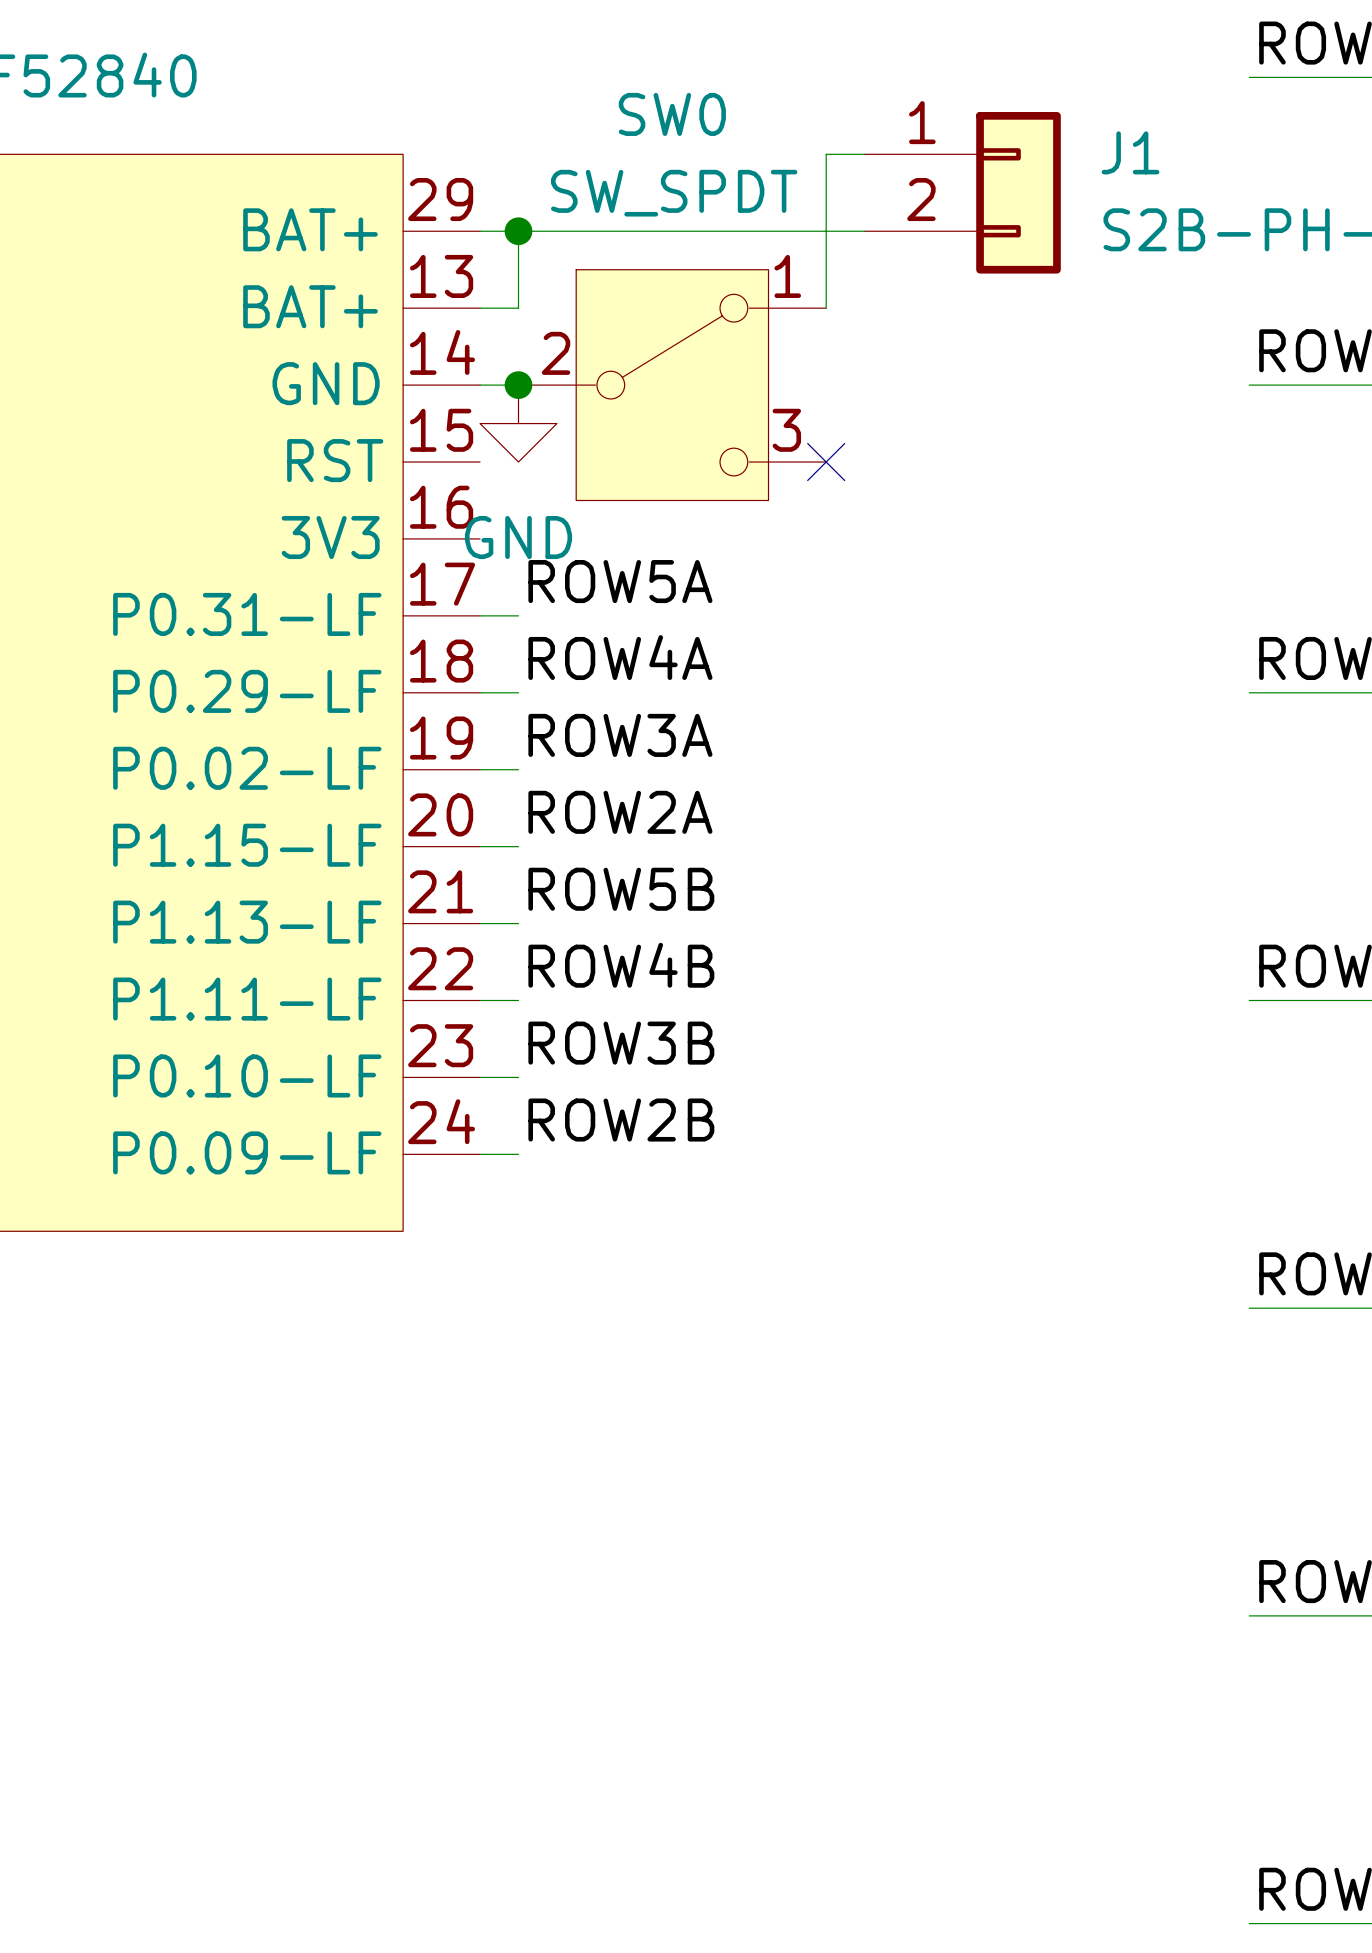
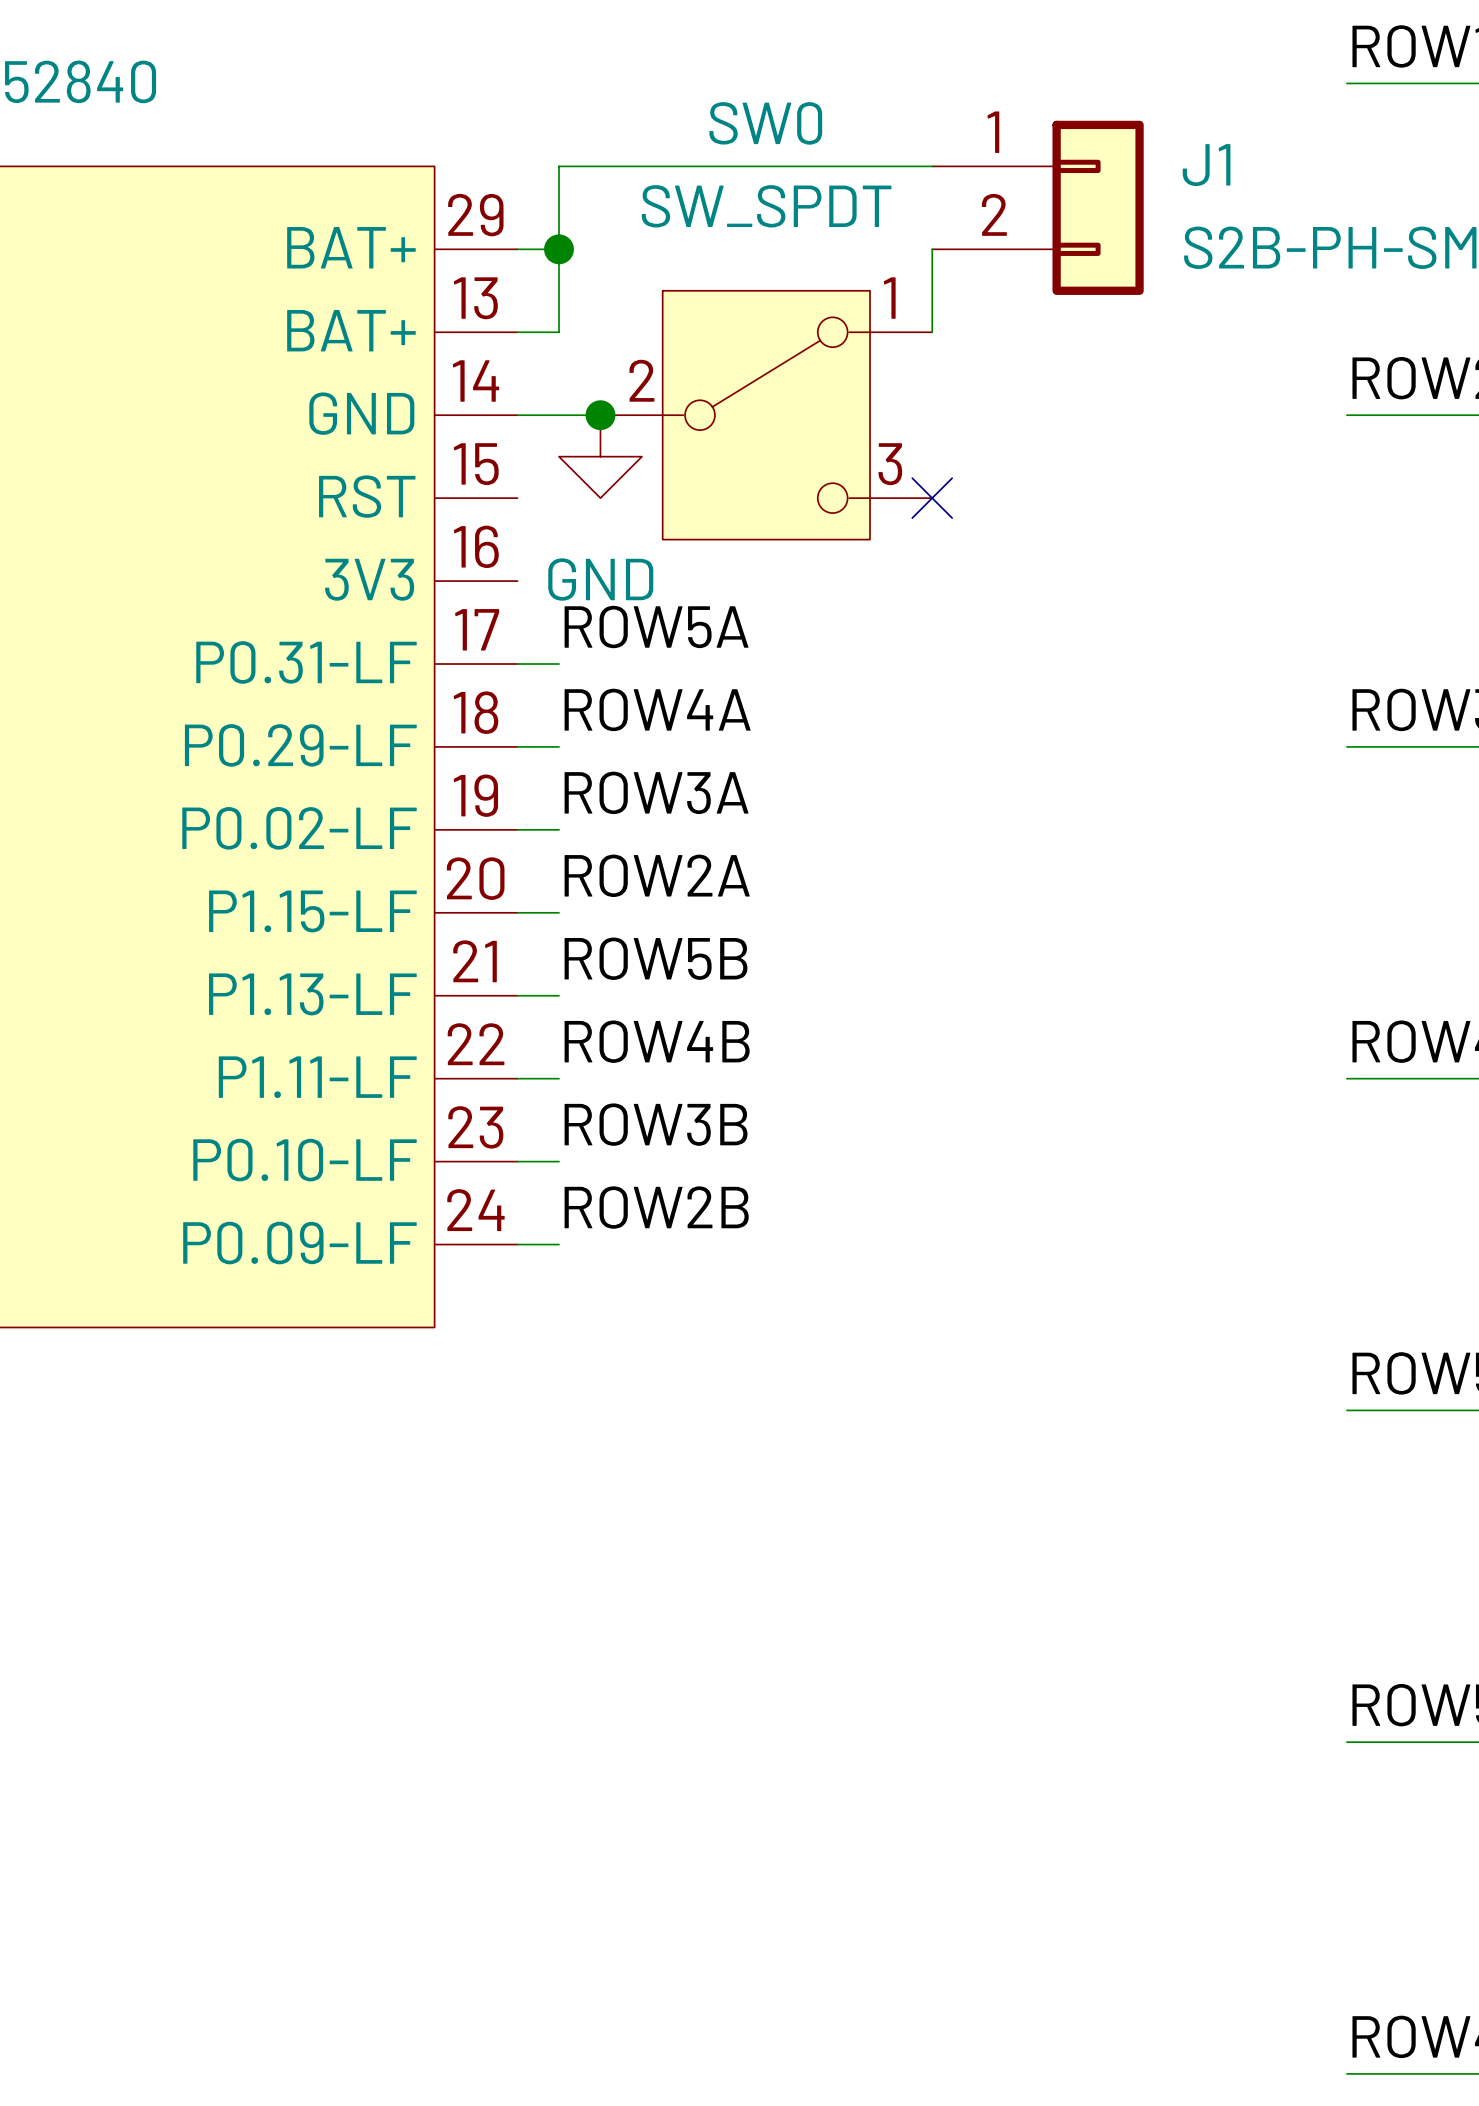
wire: (826, 154) (826, 308) -> none
wire: (518, 231) (864, 231) -> (559, 249) (559, 166) (890, 166)
wire: none -> (932, 249) (932, 332)
junction position: (518, 385) -> (600, 415)
SW0 position: (672, 385) -> (766, 415)
power symbol position: GND (518, 423) -> GND (600, 456)
no-connect mark position: (826, 462) -> (932, 498)

